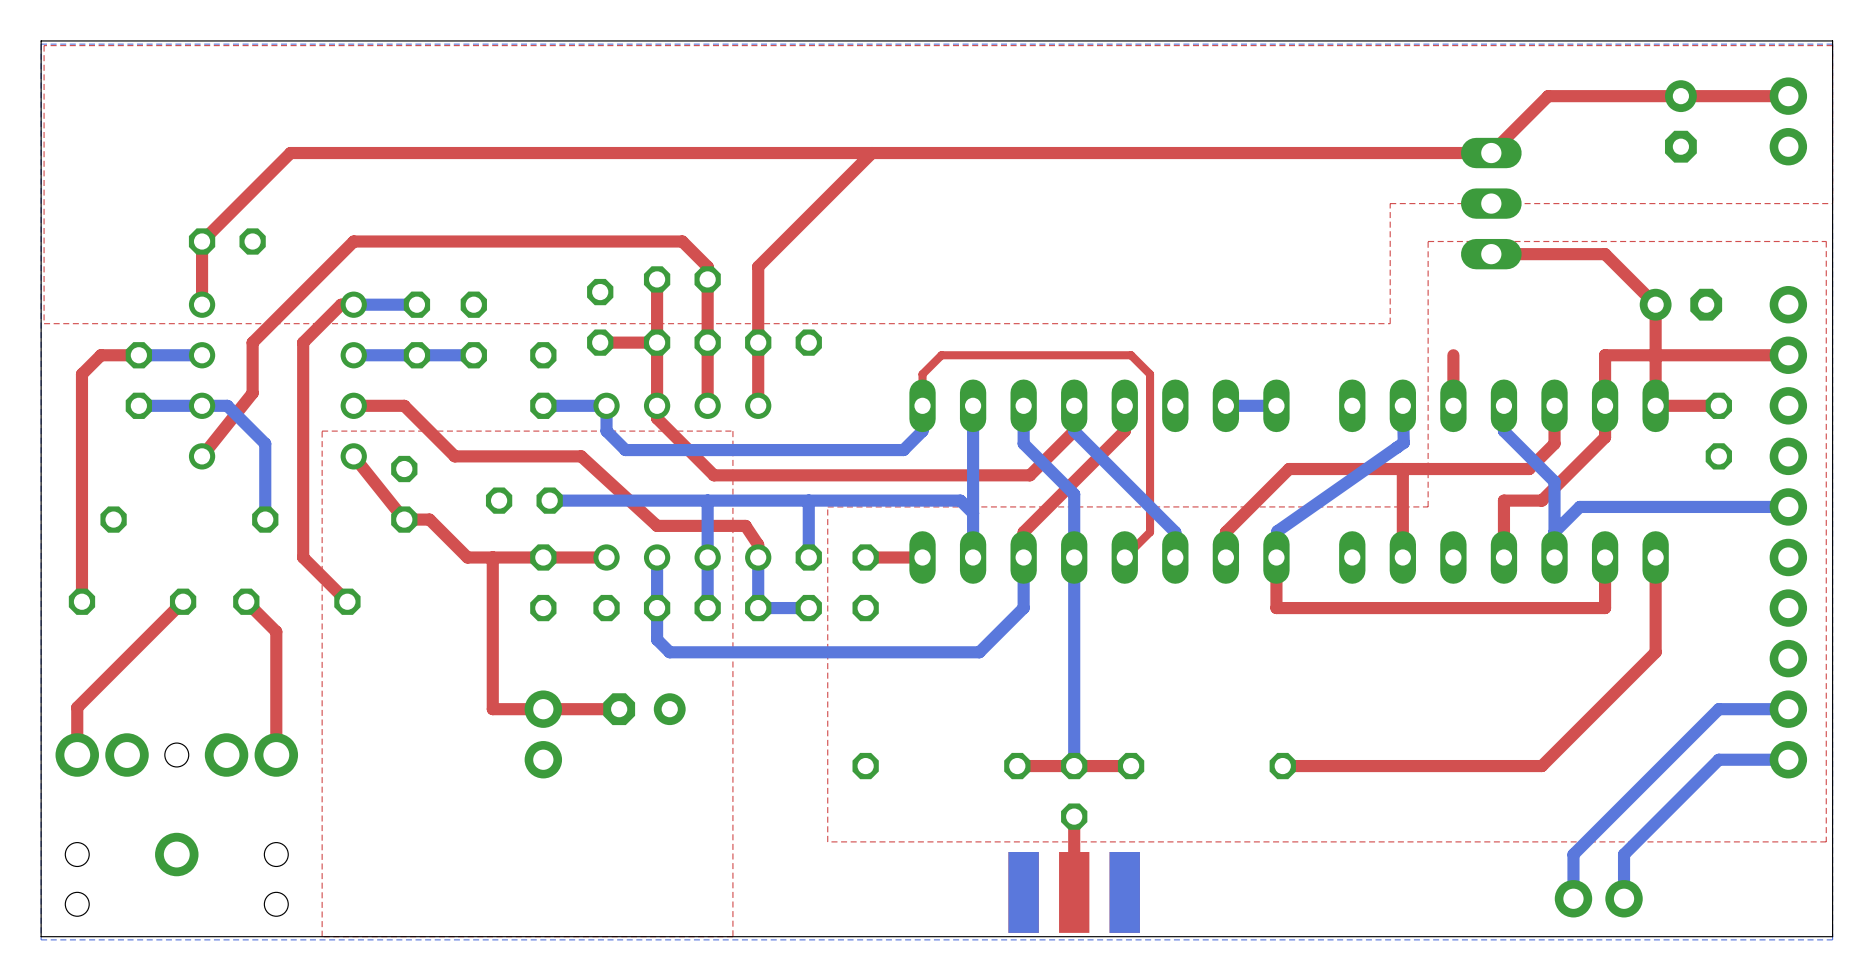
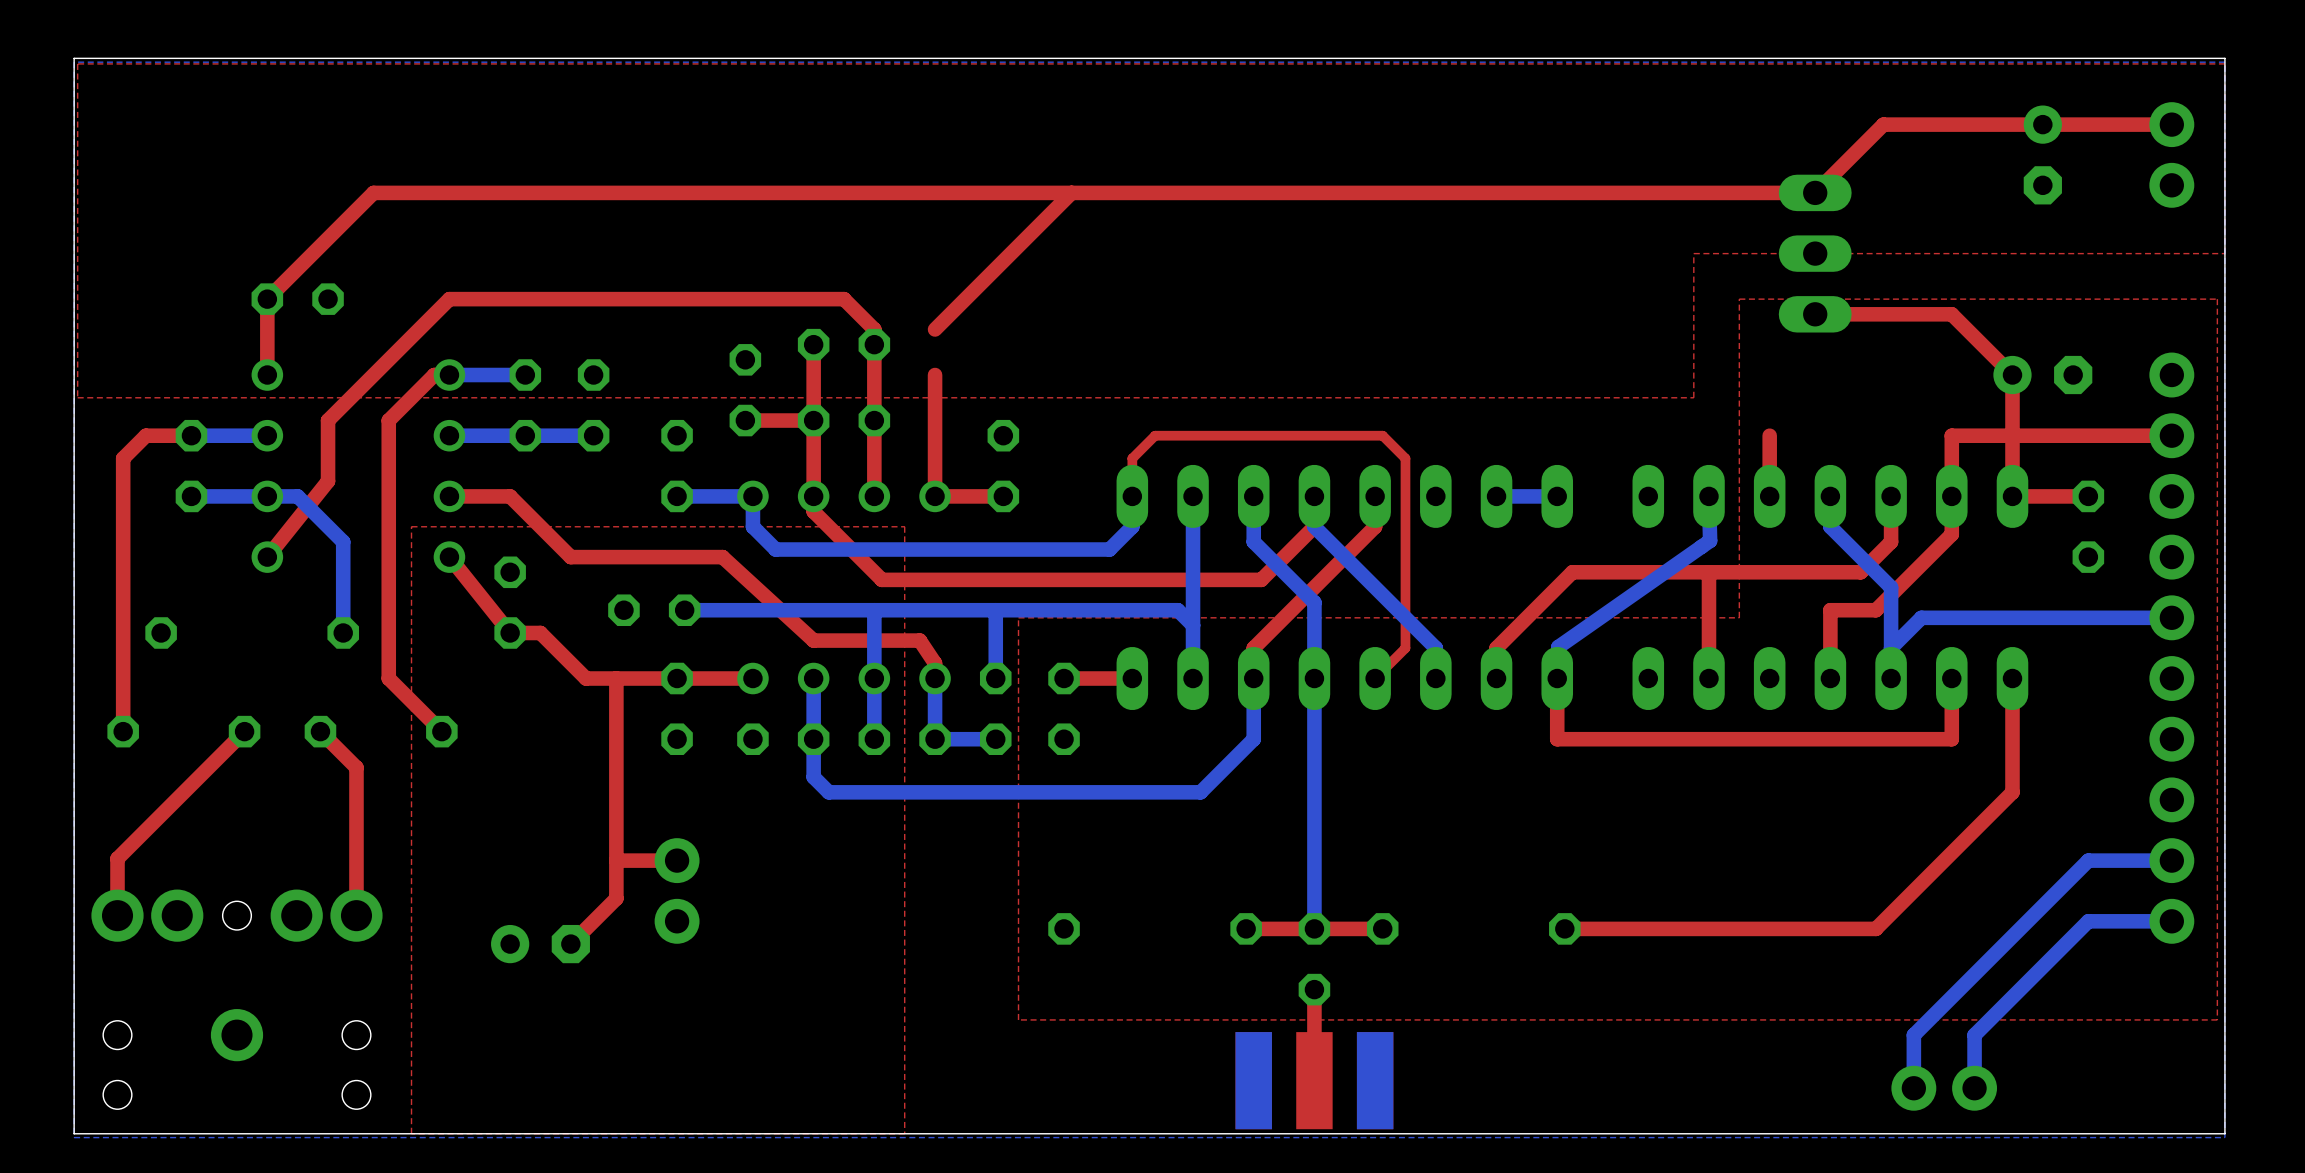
top track: (758, 266) (758, 304) -> none
part rotation: 0° (783, 342) -> 90° clockwise (1003, 466)
part position: (783, 342) -> (1003, 466)
top track: none -> (1003, 496) (935, 496)
top track: none -> (616, 860) (616, 898) (570, 944)
top track: (619, 709) (543, 709) -> none
part rotation: 0° (644, 709) -> 180° (540, 944)
part position: (644, 709) -> (540, 944)

